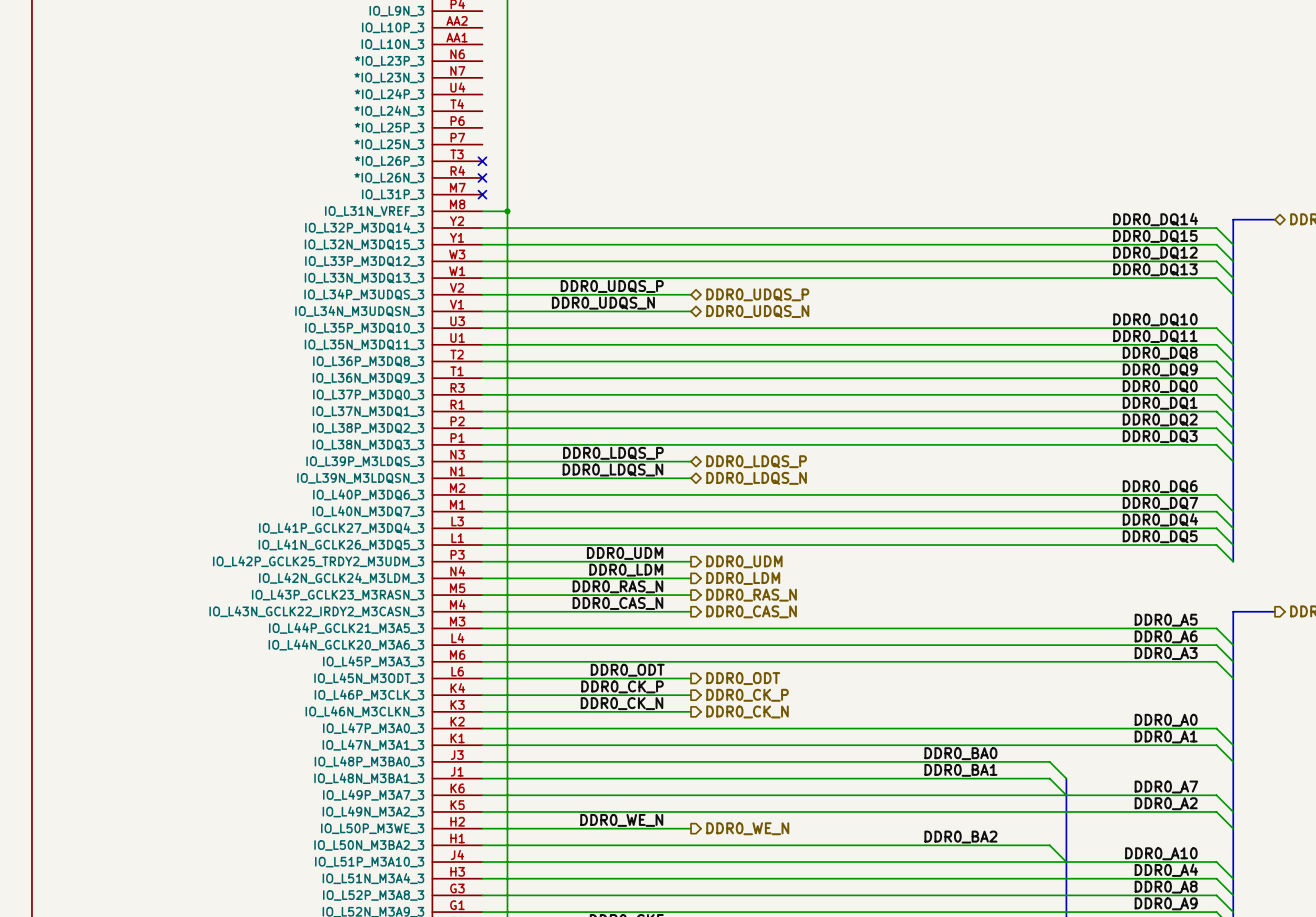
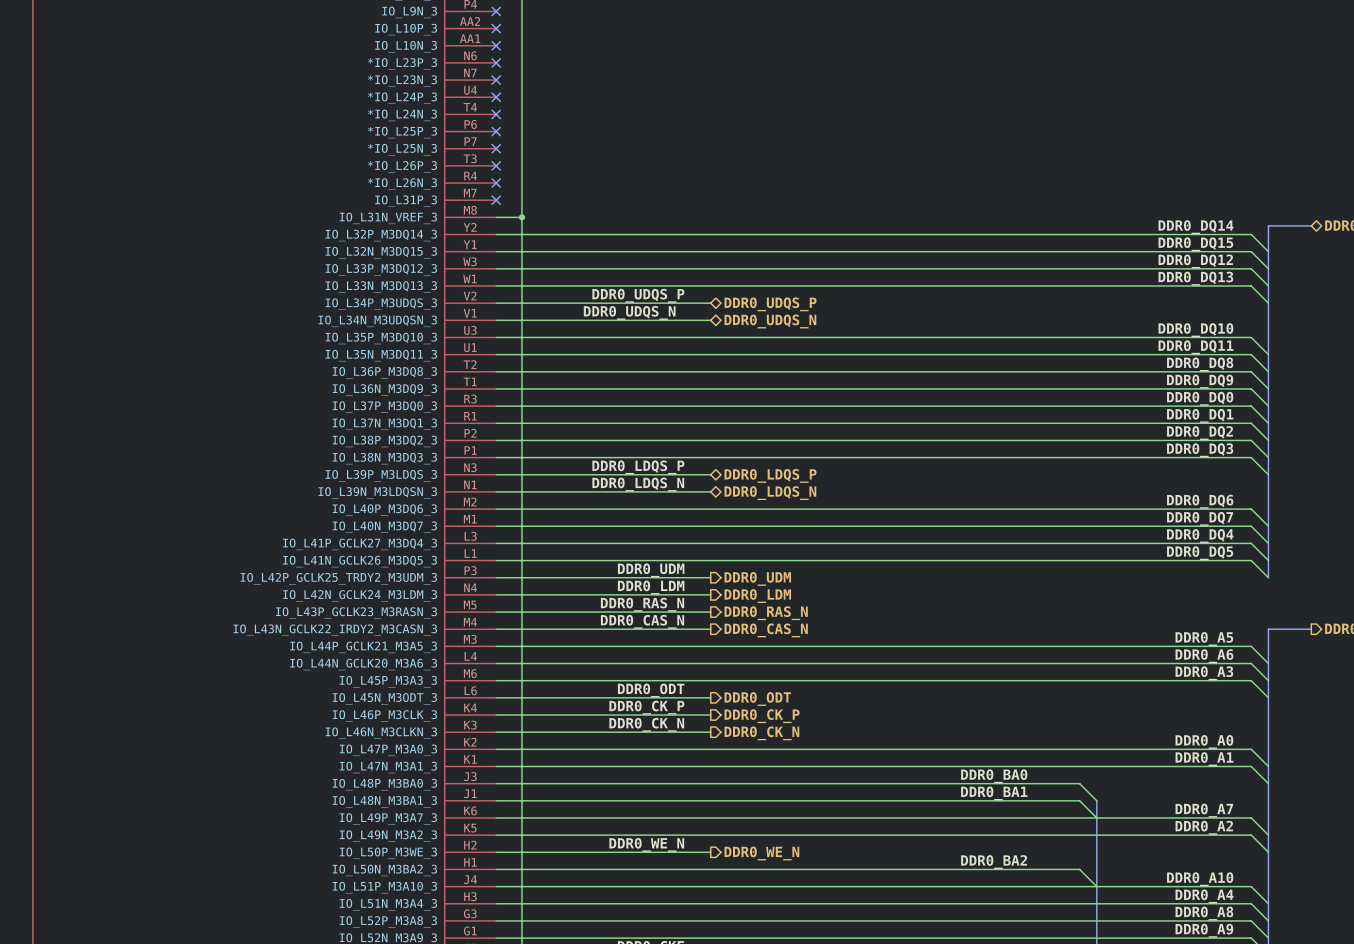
no-connect mark: none -> (496, 11)
no-connect mark: none -> (496, 28)
no-connect mark: none -> (496, 45)
no-connect mark: none -> (496, 62)
no-connect mark: none -> (496, 80)
no-connect mark: none -> (496, 97)
no-connect mark: none -> (496, 114)
no-connect mark: none -> (496, 131)
no-connect mark: none -> (496, 148)

